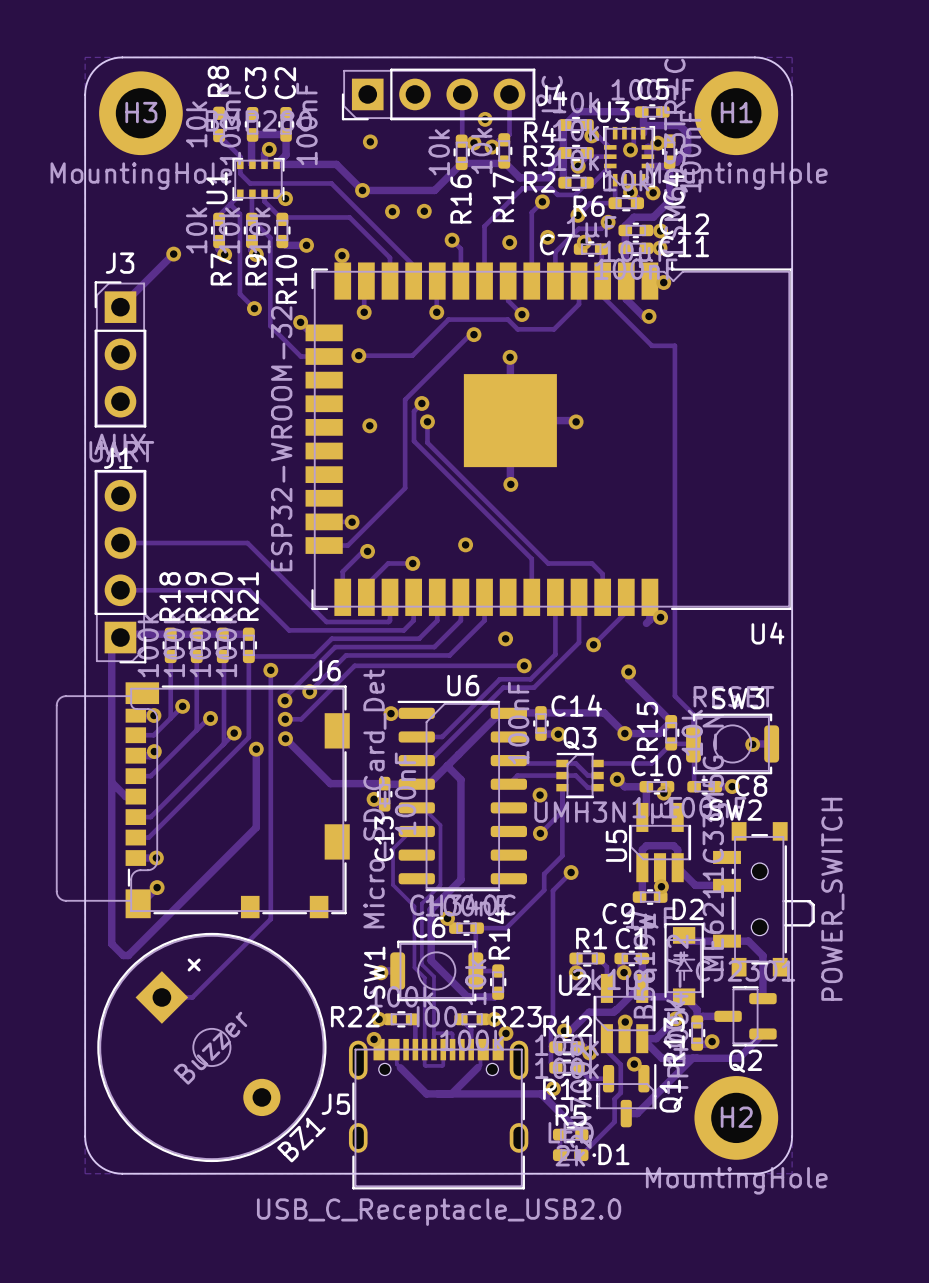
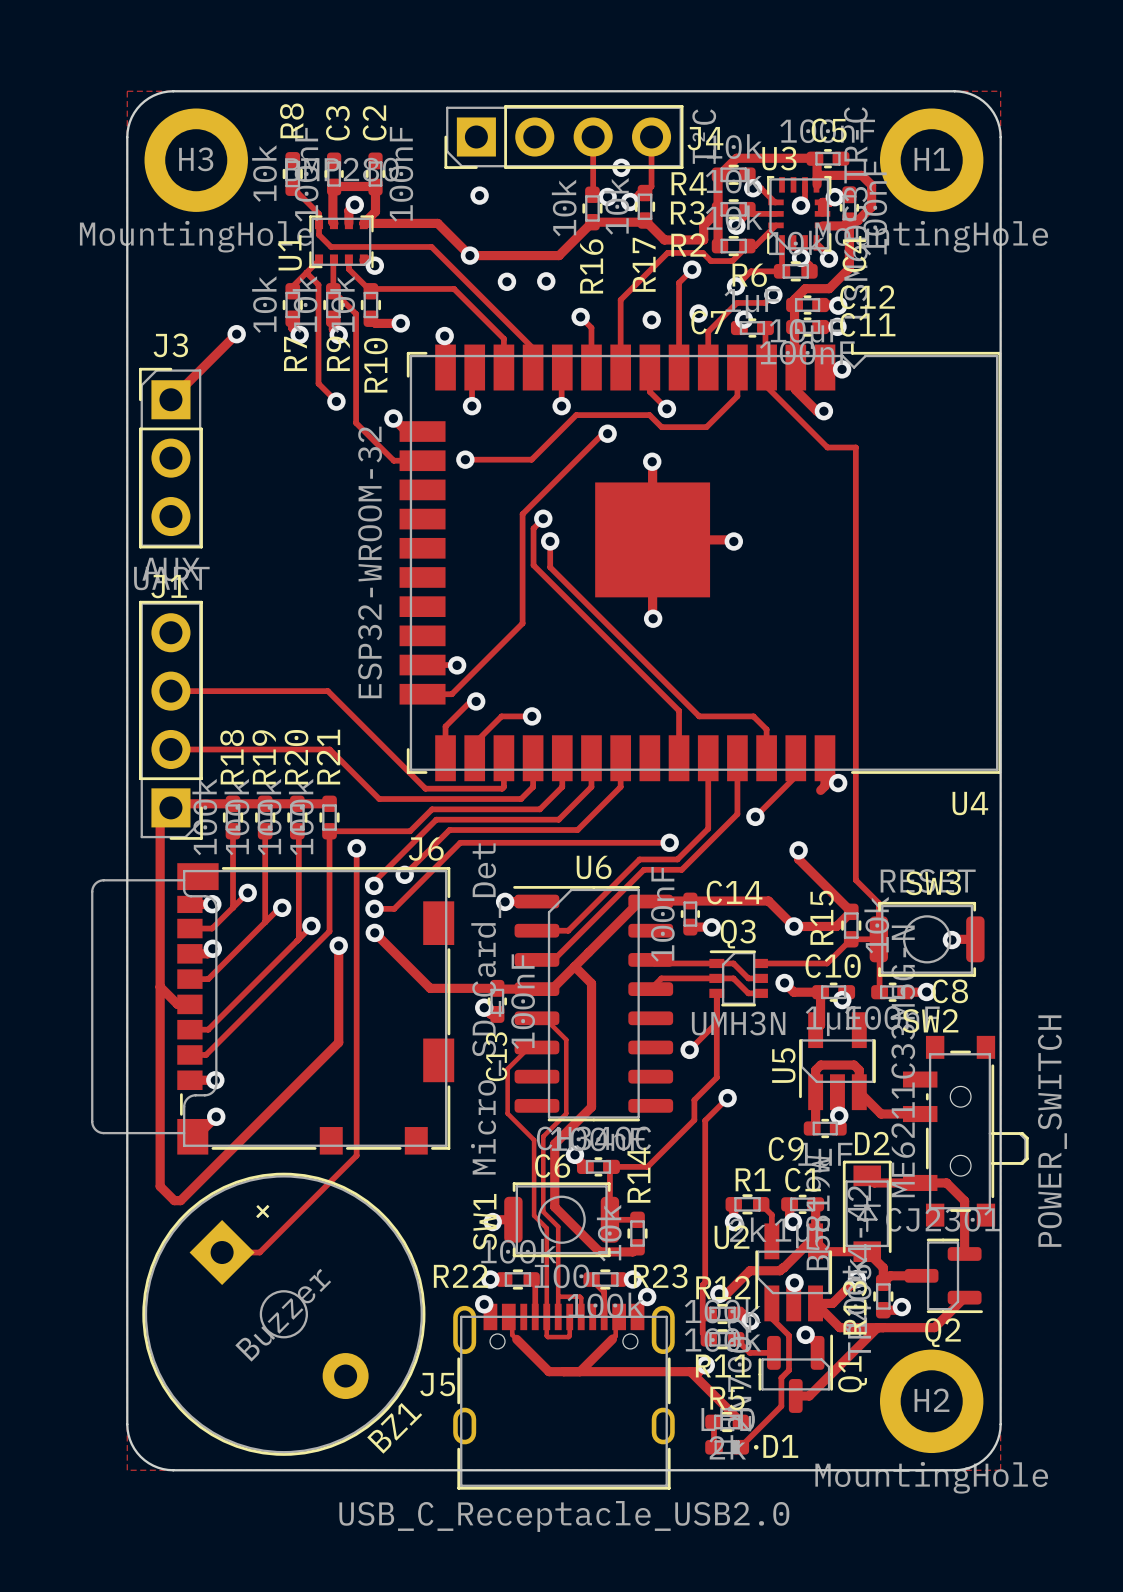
via: (369, 425) -> none
via: (465, 544) -> none
via: (505, 638) -> none
via: (540, 795) -> none

